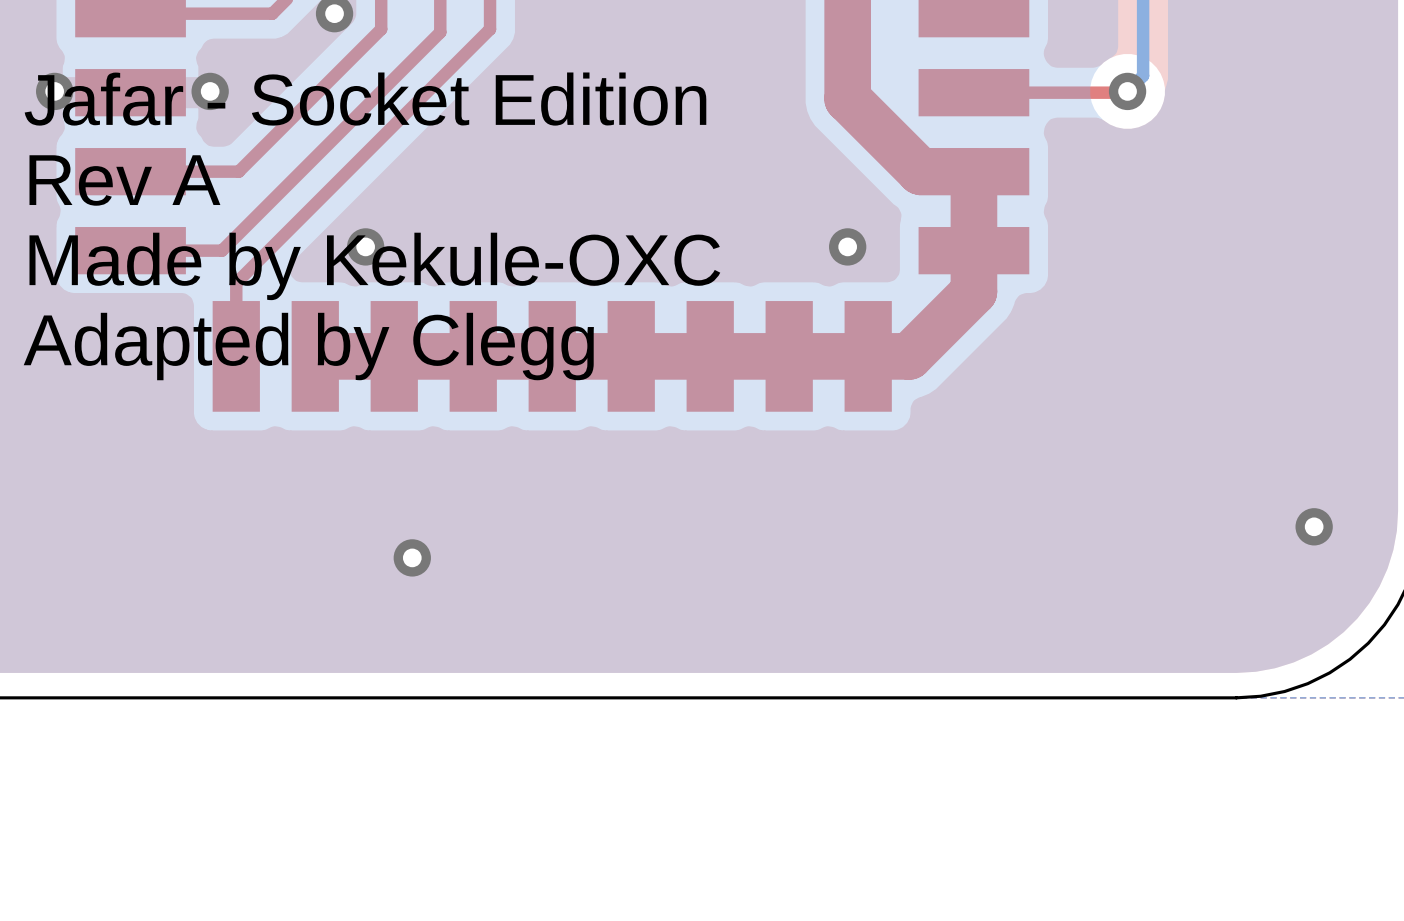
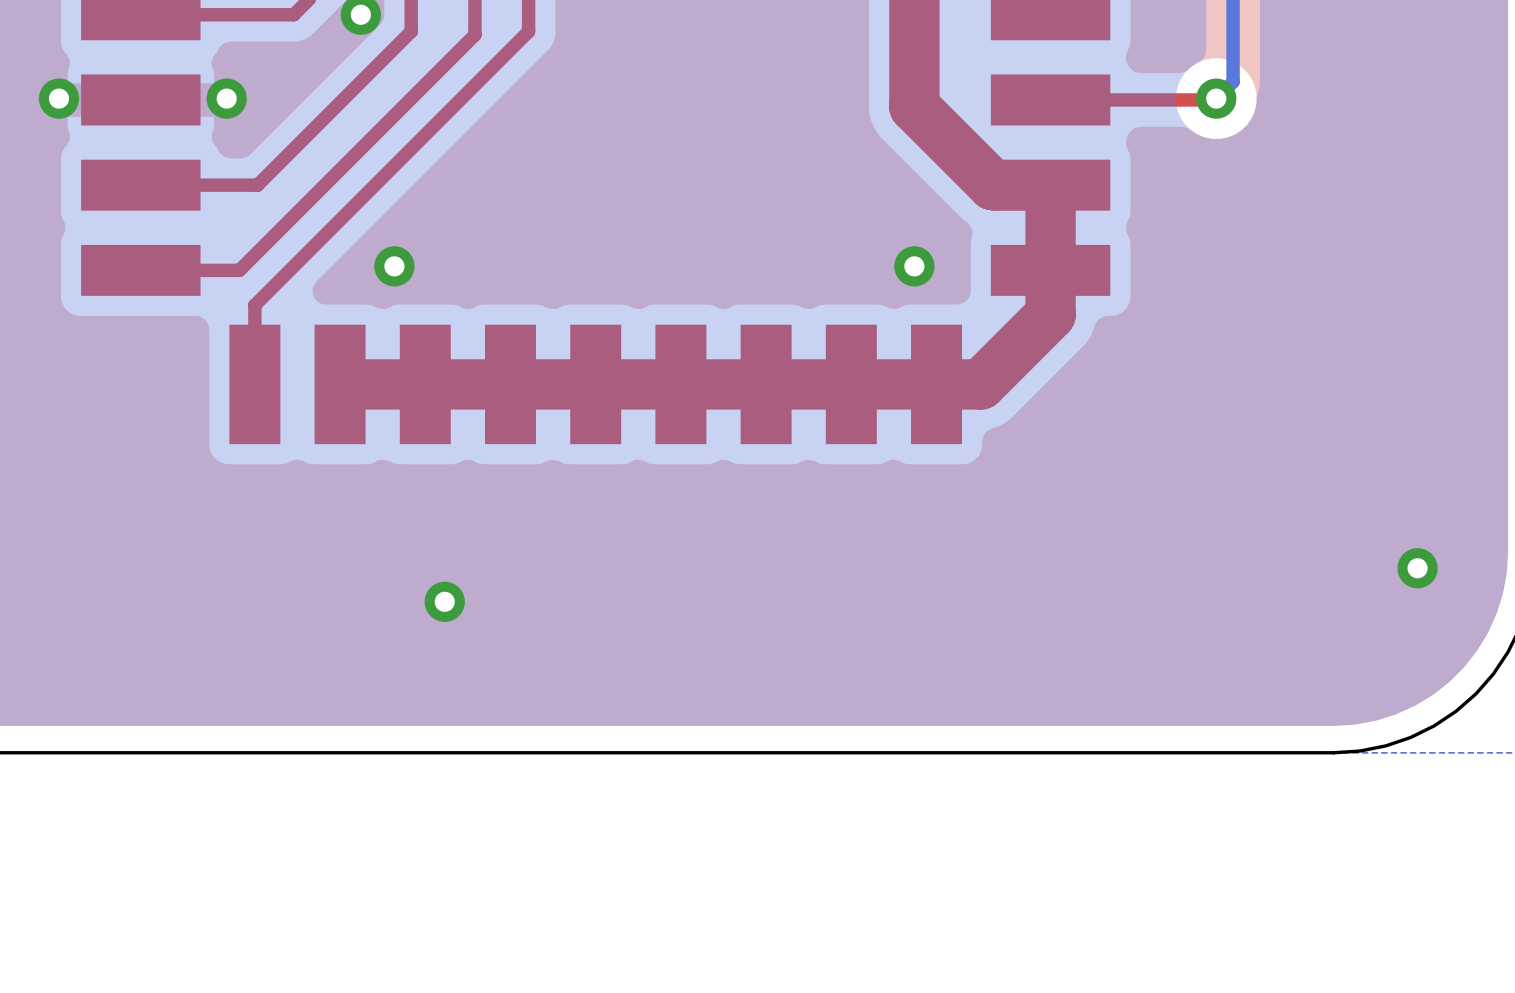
text: Jafar - Socket Edition (365, 99) -> none
text: Rev A (124, 180) -> none
text: Made by Kekule-OXC (374, 266) -> none
text: Adapted by Clegg (308, 346) -> none

